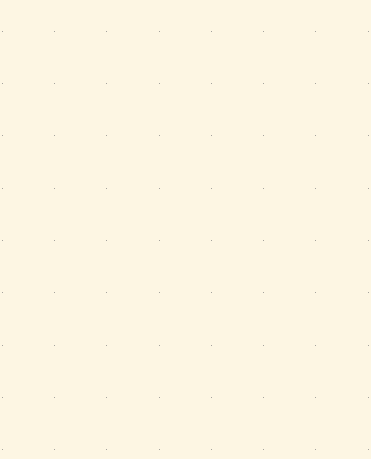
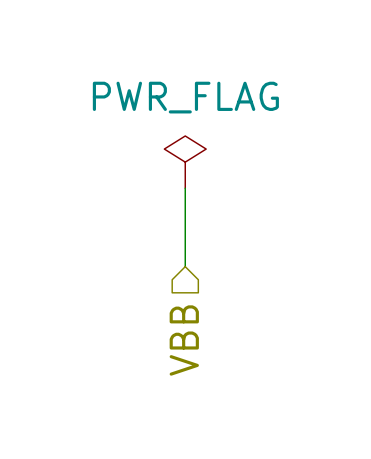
power symbol: none -> PWR_FLAG (185, 162)
wire: none -> (185, 188) (185, 266)
hierarchical label: none -> VBB (184, 340)

